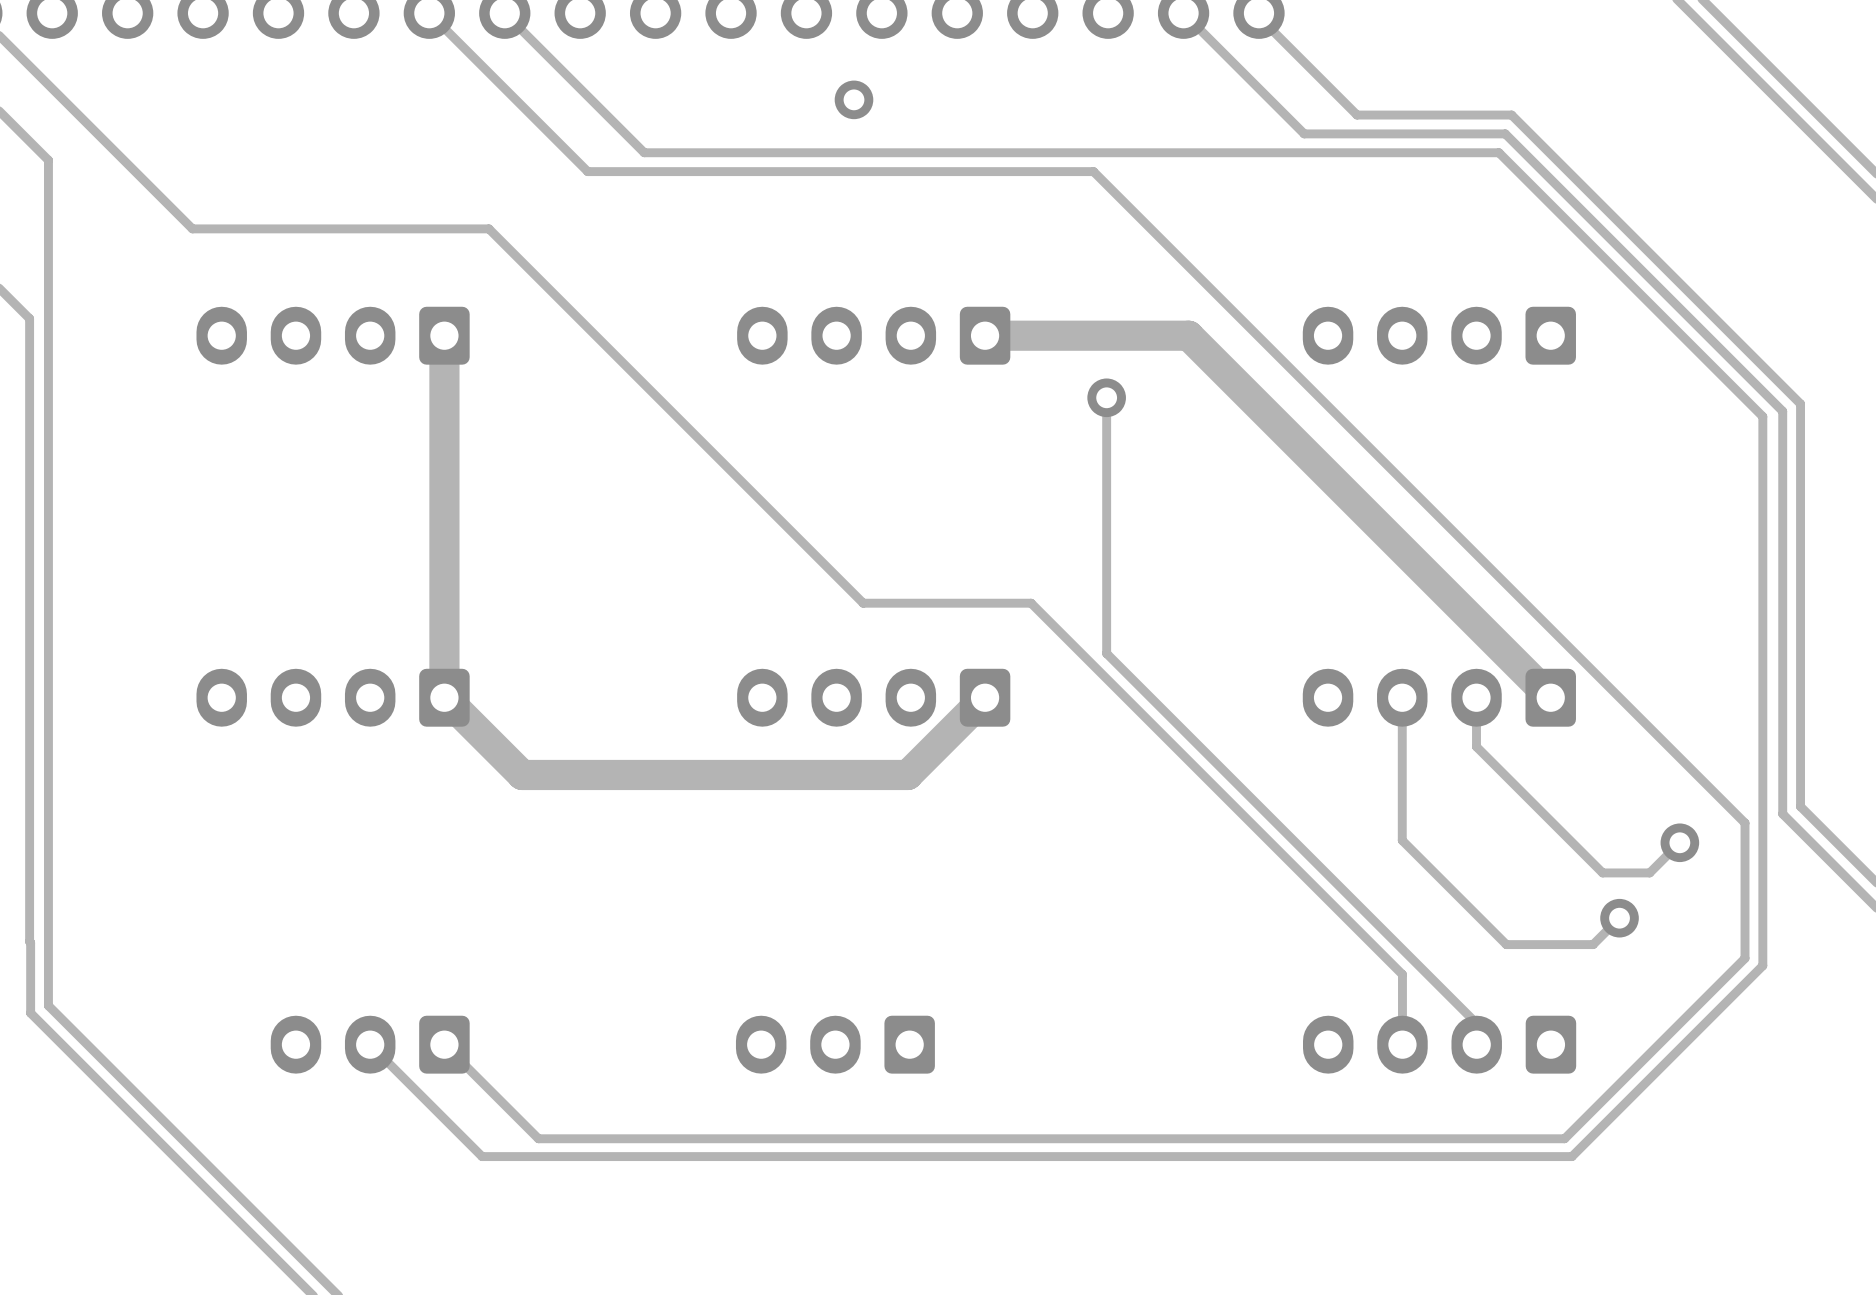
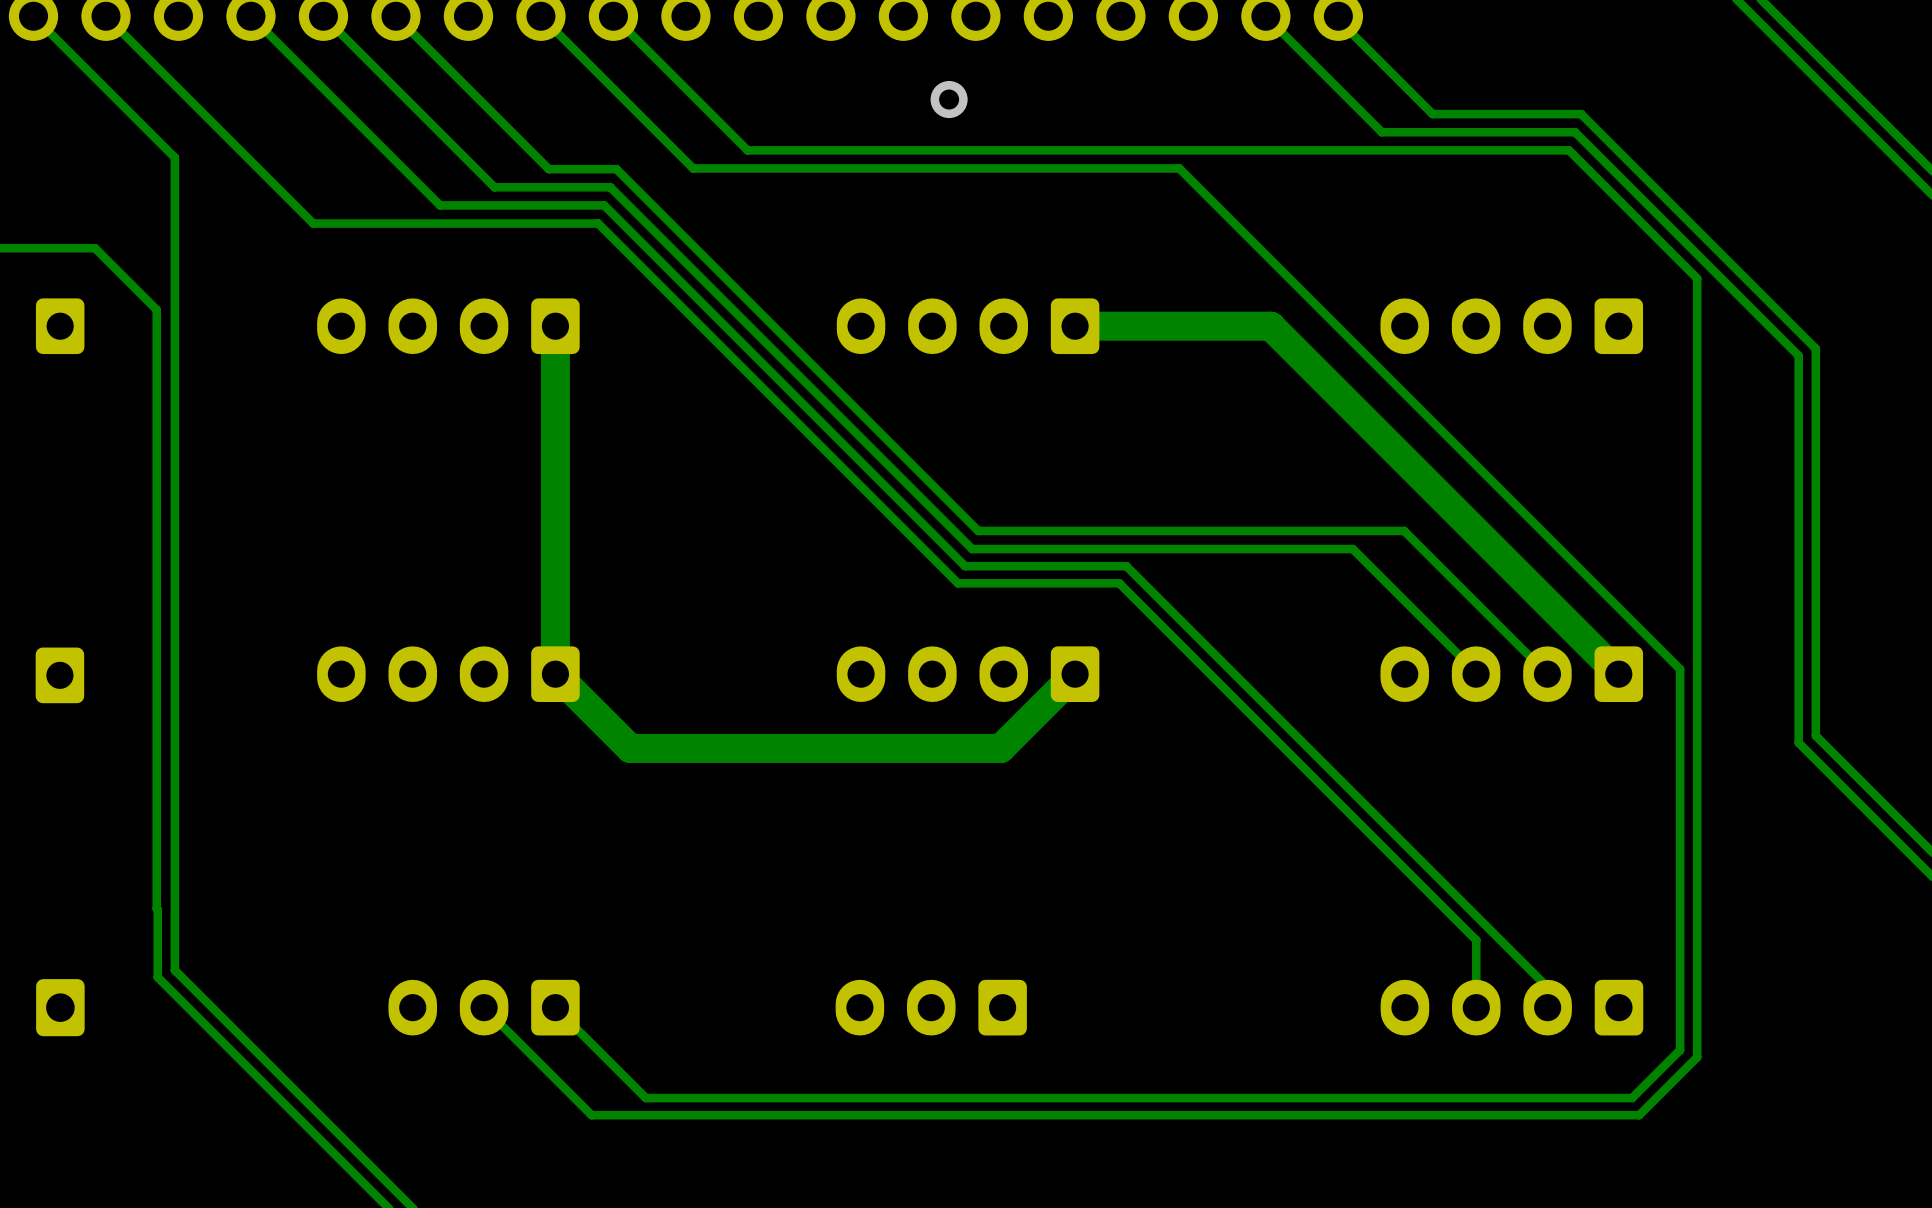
track: none -> (323, 16) (494, 187) (610, 187) (972, 549) (1352, 549) (1476, 672)
track: (1632, 286) (1762, 416) (1762, 965) (1632, 1096) -> (1697, 278) (1697, 1057)
track: (1755, 359) (1800, 403) (1800, 806) -> (1815, 348) (1815, 735) (1858, 778)
track: (1737, 366) (1782, 411) (1782, 813) -> (1798, 355) (1798, 742) (1841, 785)
track: (1106, 397) (1106, 653) -> (250, 16) (440, 205) (604, 205) (965, 566) (1126, 566) (1191, 631)
via: (1106, 397) -> none
track: (1614, 692) (1745, 823) (1745, 958) (1614, 1088) -> (1680, 669) (1680, 1050)
track: (1402, 697) (1402, 840) (1506, 944) (1593, 944) (1619, 918) -> none
track: (1476, 697) (1476, 746) (1602, 872) (1649, 872) (1679, 842) -> (1547, 674) (1404, 530) (978, 530) (616, 169) (548, 169) (395, 16)
via: (1679, 842) -> none
via: (1619, 918) -> none

